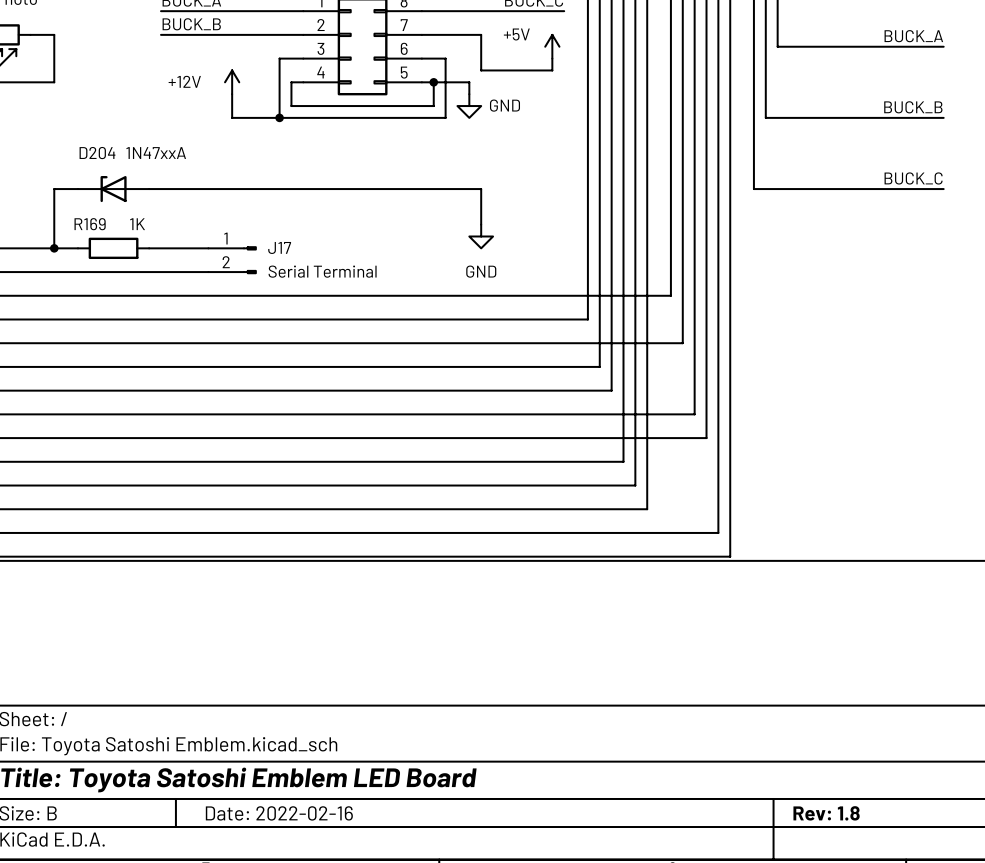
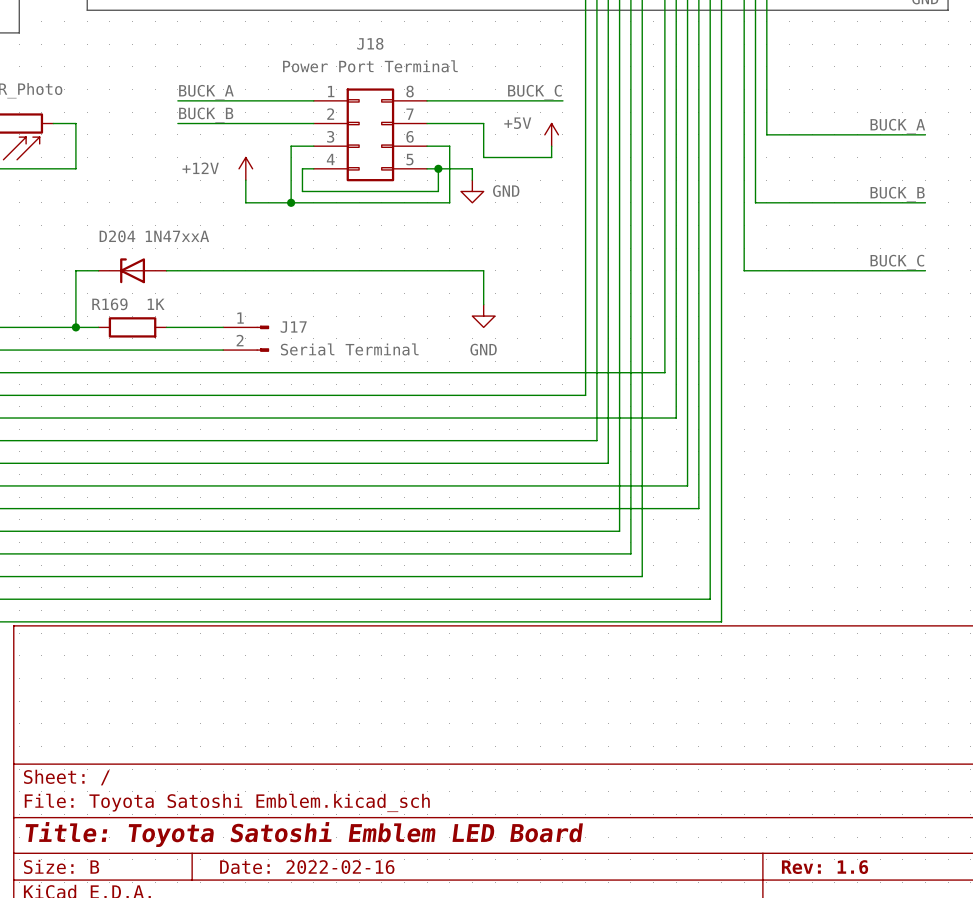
title block: Rev: 1.8 (826, 813) -> Rev: 1.6 (825, 867)

